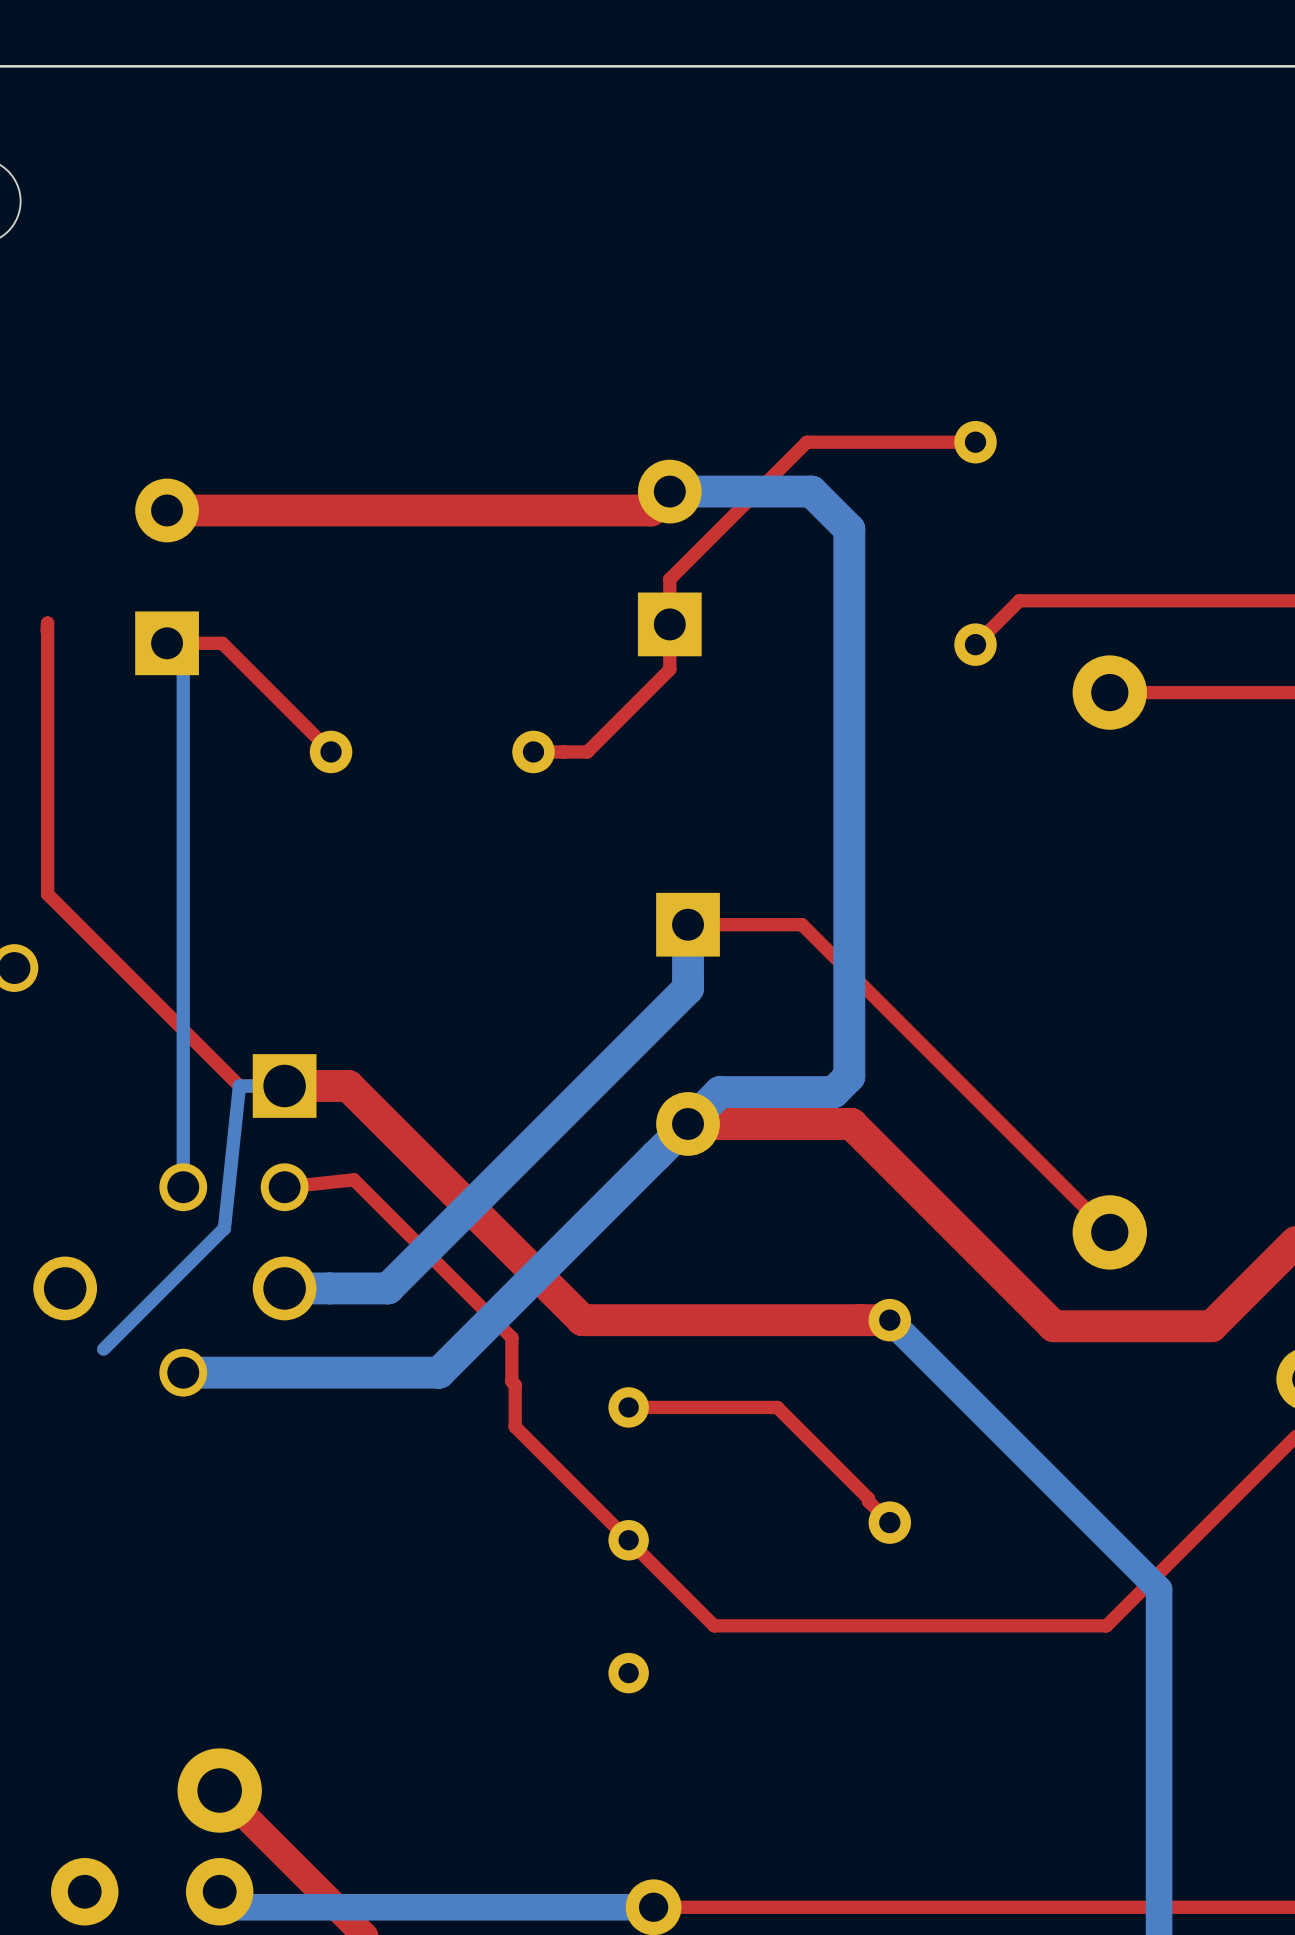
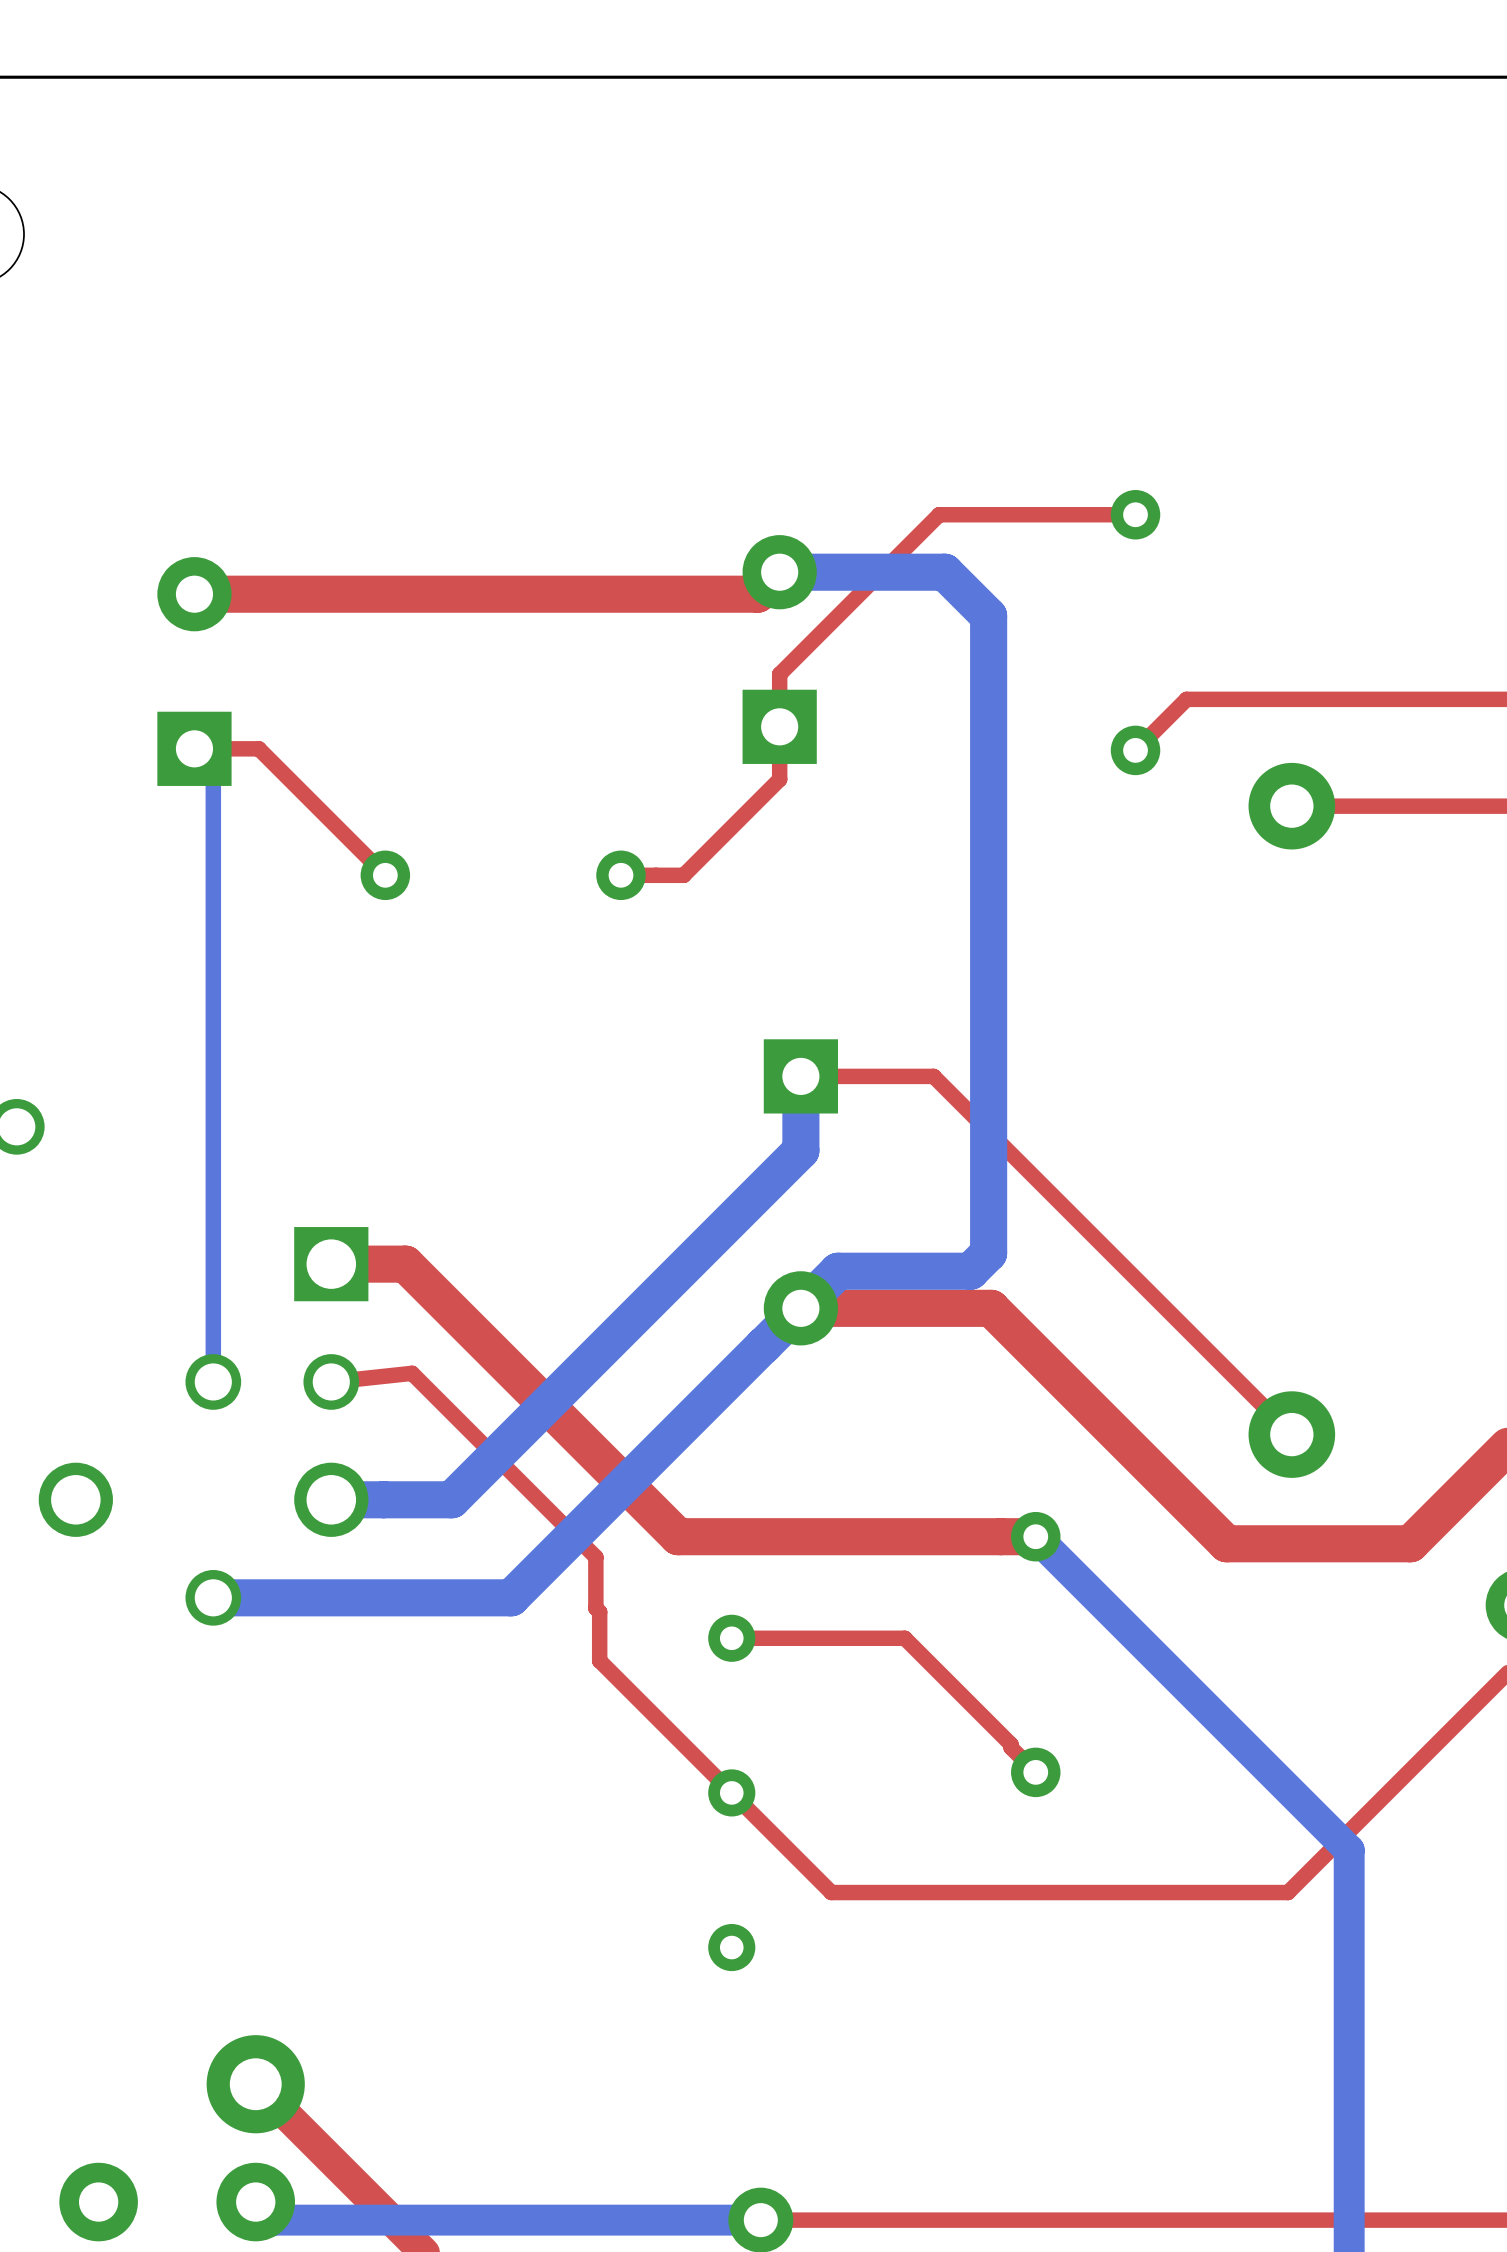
top track: (46, 630) (47, 623) (47, 894) (239, 1086) (284, 1086) -> none
bottom track: (284, 1086) (239, 1086) (224, 1228) (103, 1349) -> none

